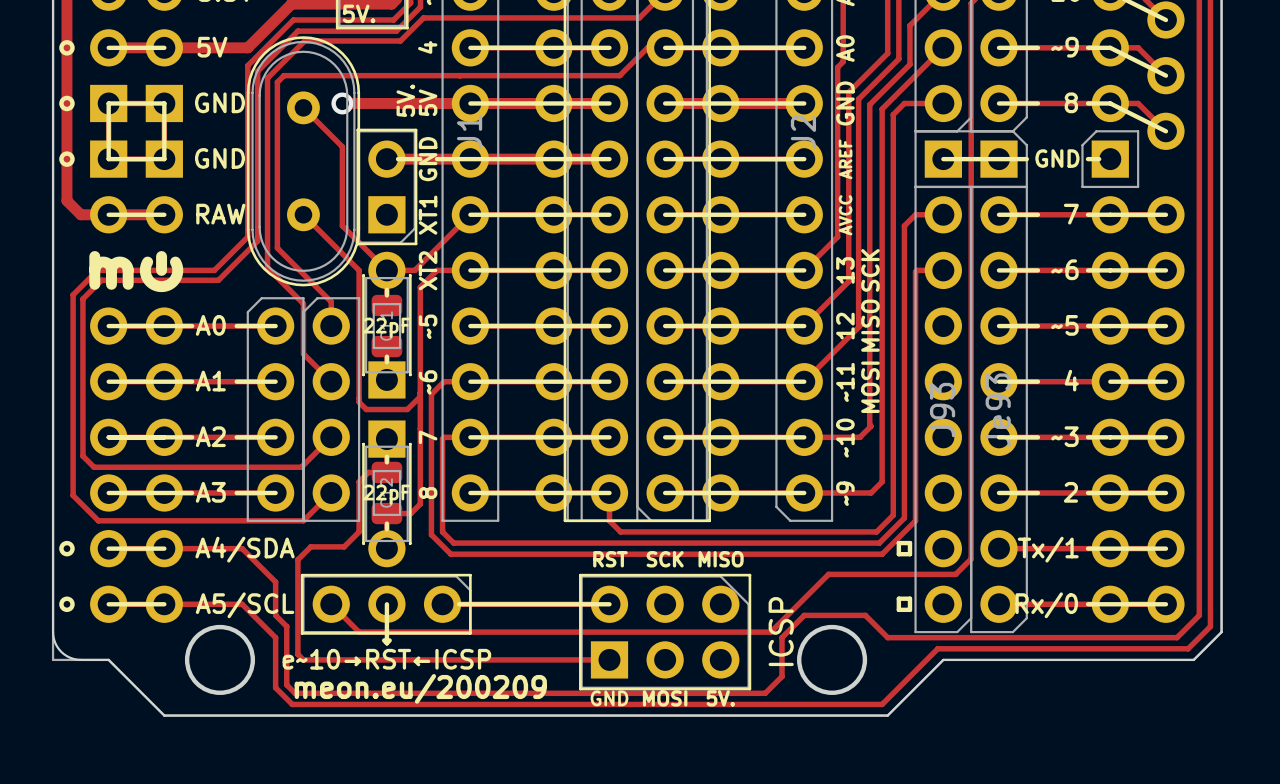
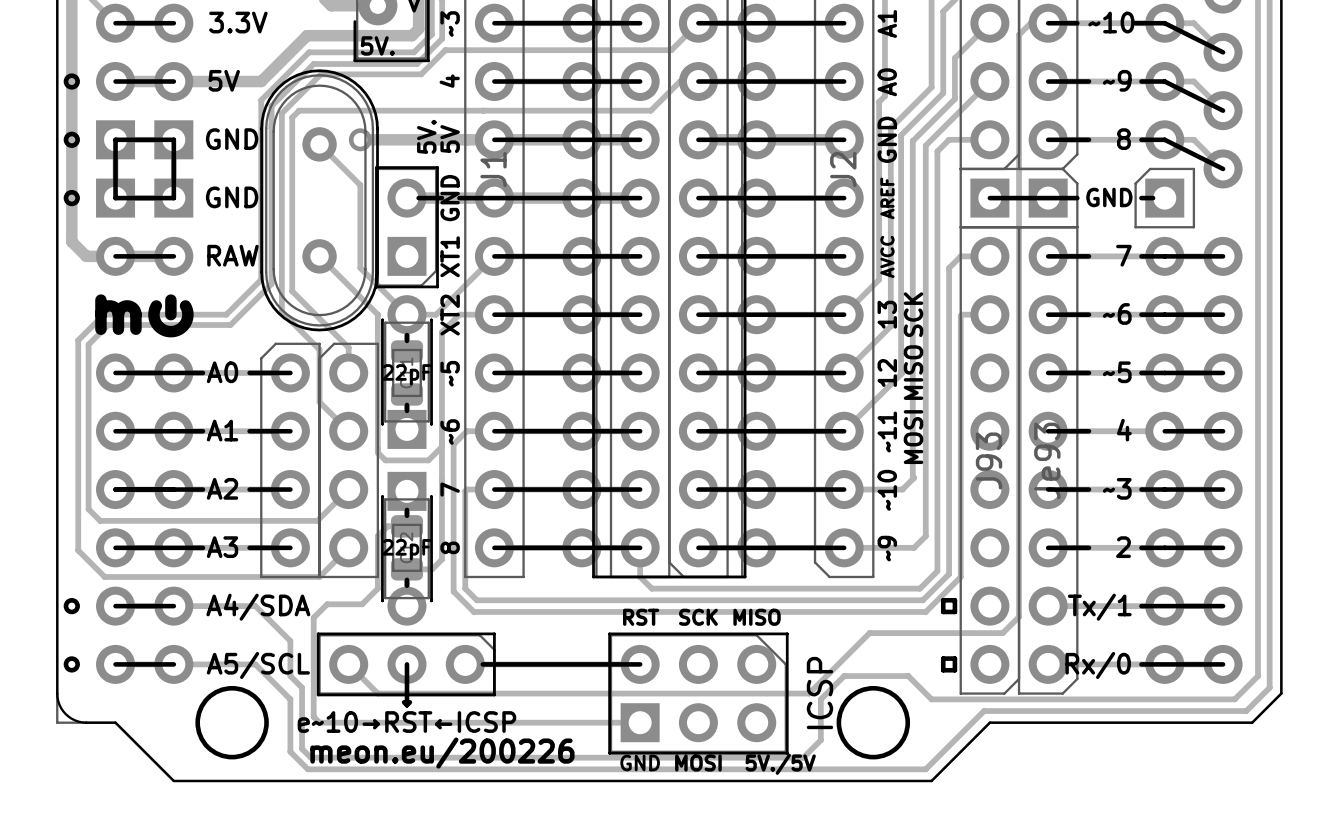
text: meon.eu/200209 (420, 688) -> meon.eu/200226 (442, 753)
text: 5V. (720, 698) -> 5V./5V (780, 764)

